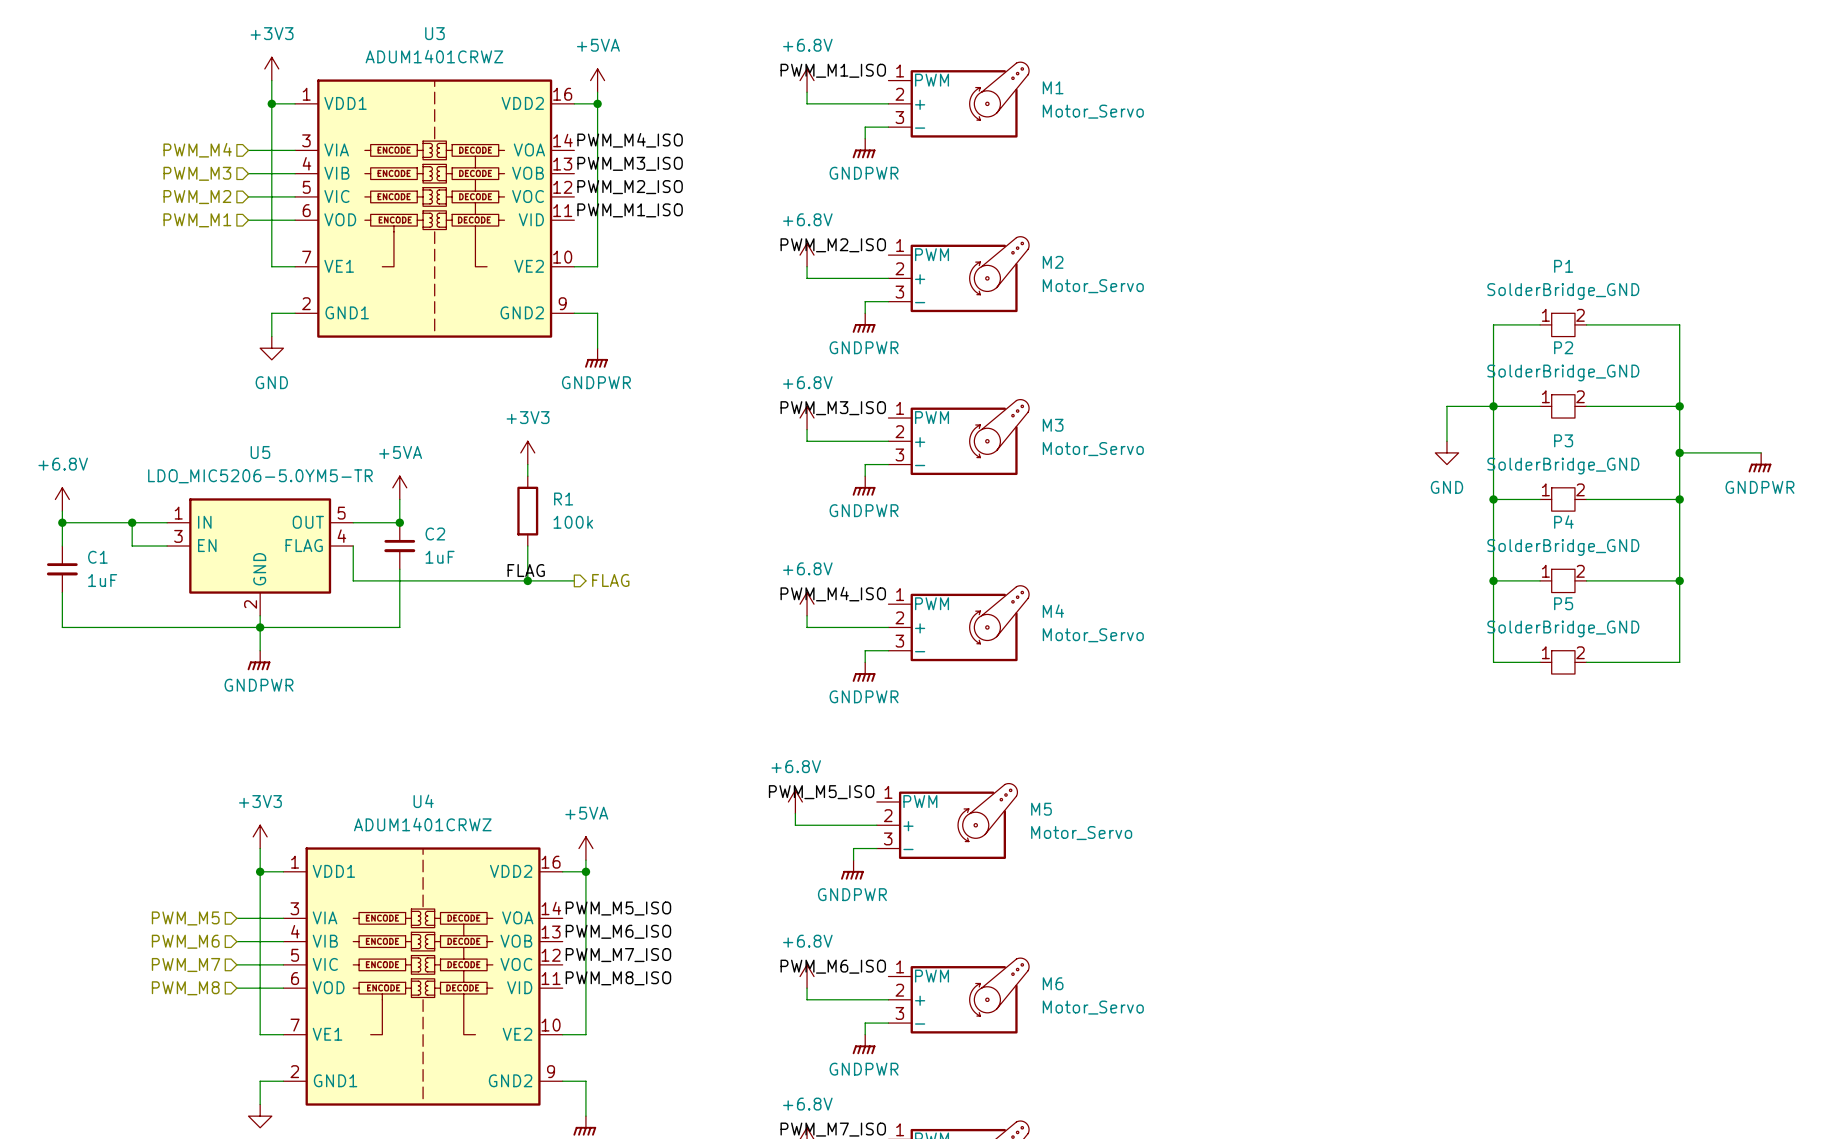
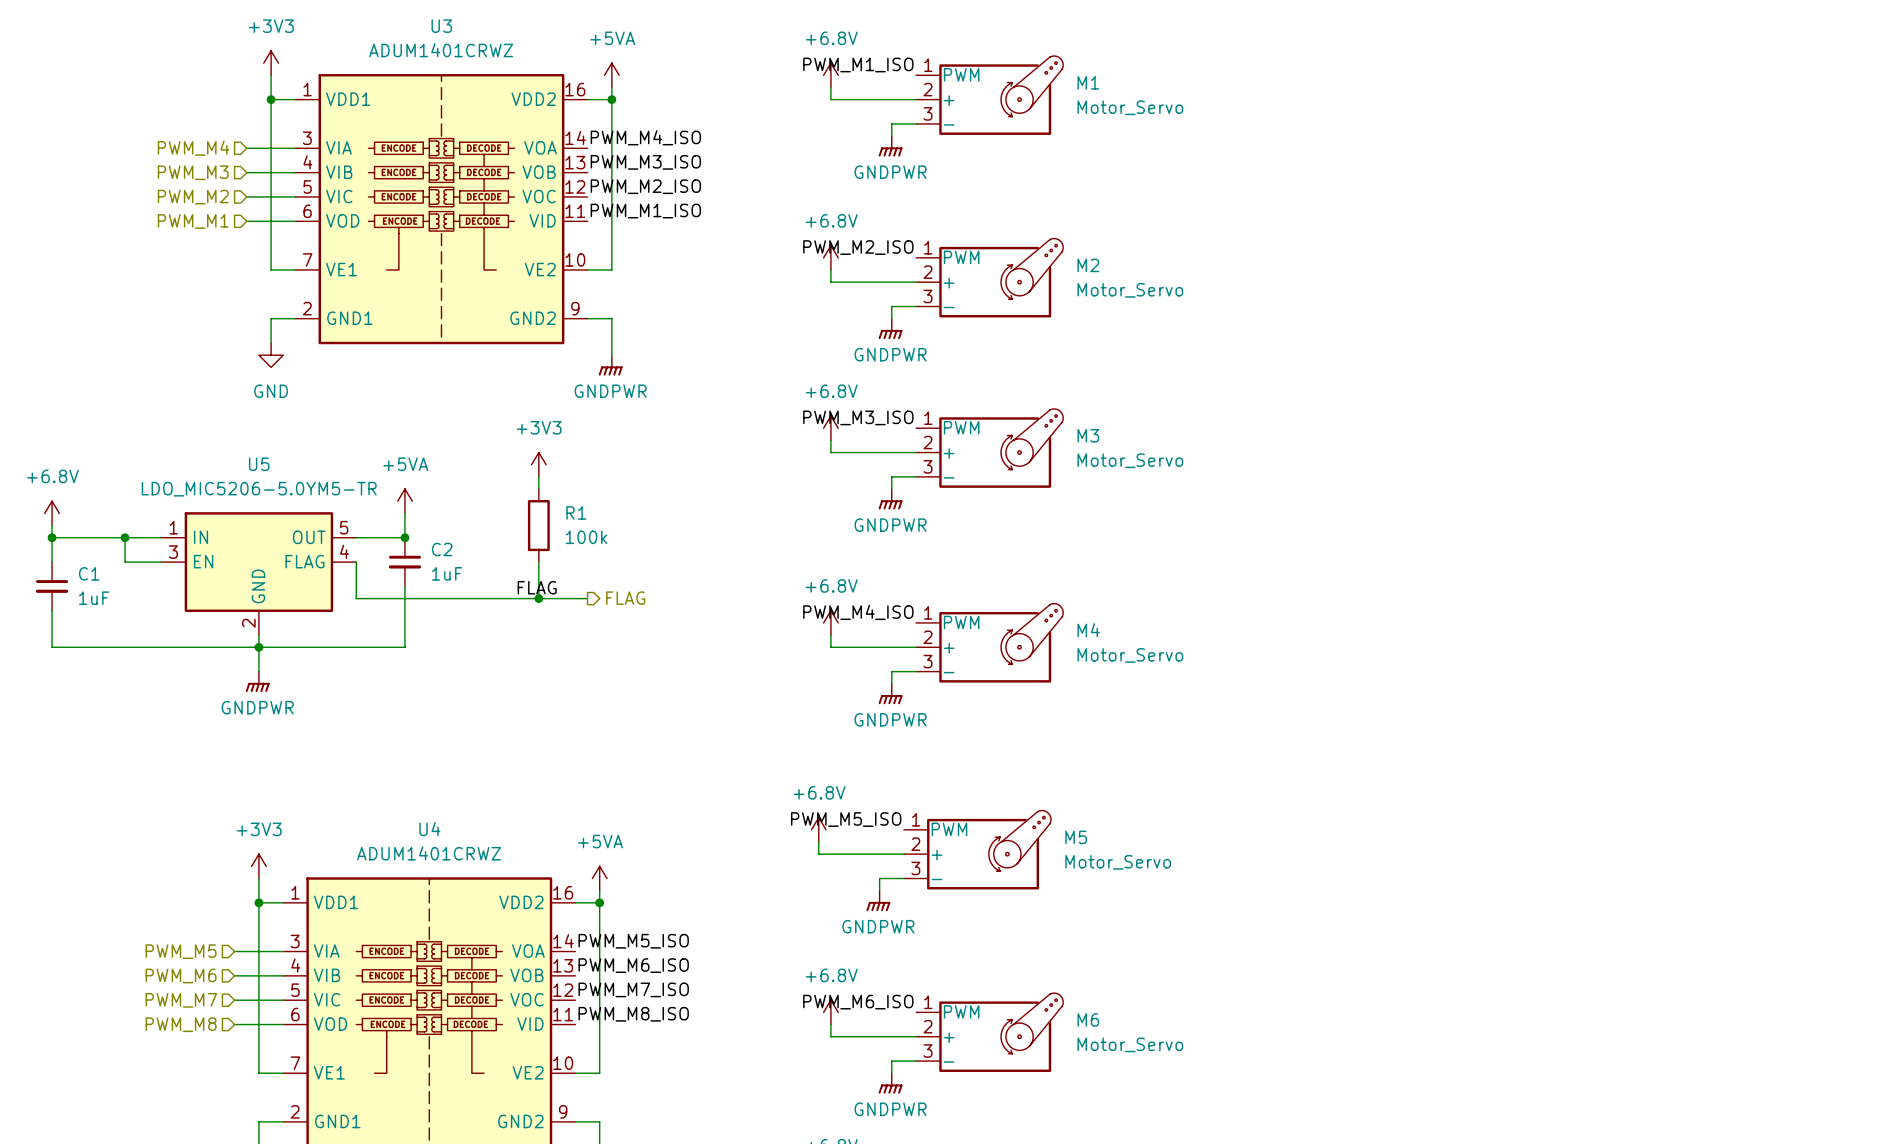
wire: (1540, 324) (1493, 324) (1493, 662) (1540, 662) -> none
P1: SolderBridge_GND (1563, 324) -> none
wire: (1586, 324) (1679, 324) (1679, 662) (1586, 662) -> none
junction: (1493, 406) -> none
wire: (1540, 406) (1446, 406) (1446, 441) -> none
P2: SolderBridge_GND (1563, 406) -> none
wire: (1586, 406) (1679, 406) -> none
junction: (1679, 406) -> none
power symbol: GND (1446, 452) -> none
wire: (1679, 452) (1761, 452) -> none
junction: (1679, 452) -> none
power symbol: GNDPWR (1759, 462) -> none
wire: (1493, 499) (1540, 499) -> none
junction: (1493, 499) -> none
P3: SolderBridge_GND (1563, 499) -> none
wire: (1586, 499) (1679, 499) -> none
junction: (1679, 499) -> none
wire: (1493, 580) (1540, 580) -> none
junction: (1493, 580) -> none
P4: SolderBridge_GND (1563, 580) -> none
wire: (1586, 580) (1679, 580) -> none
junction: (1679, 580) -> none
P5: SolderBridge_GND (1563, 662) -> none

